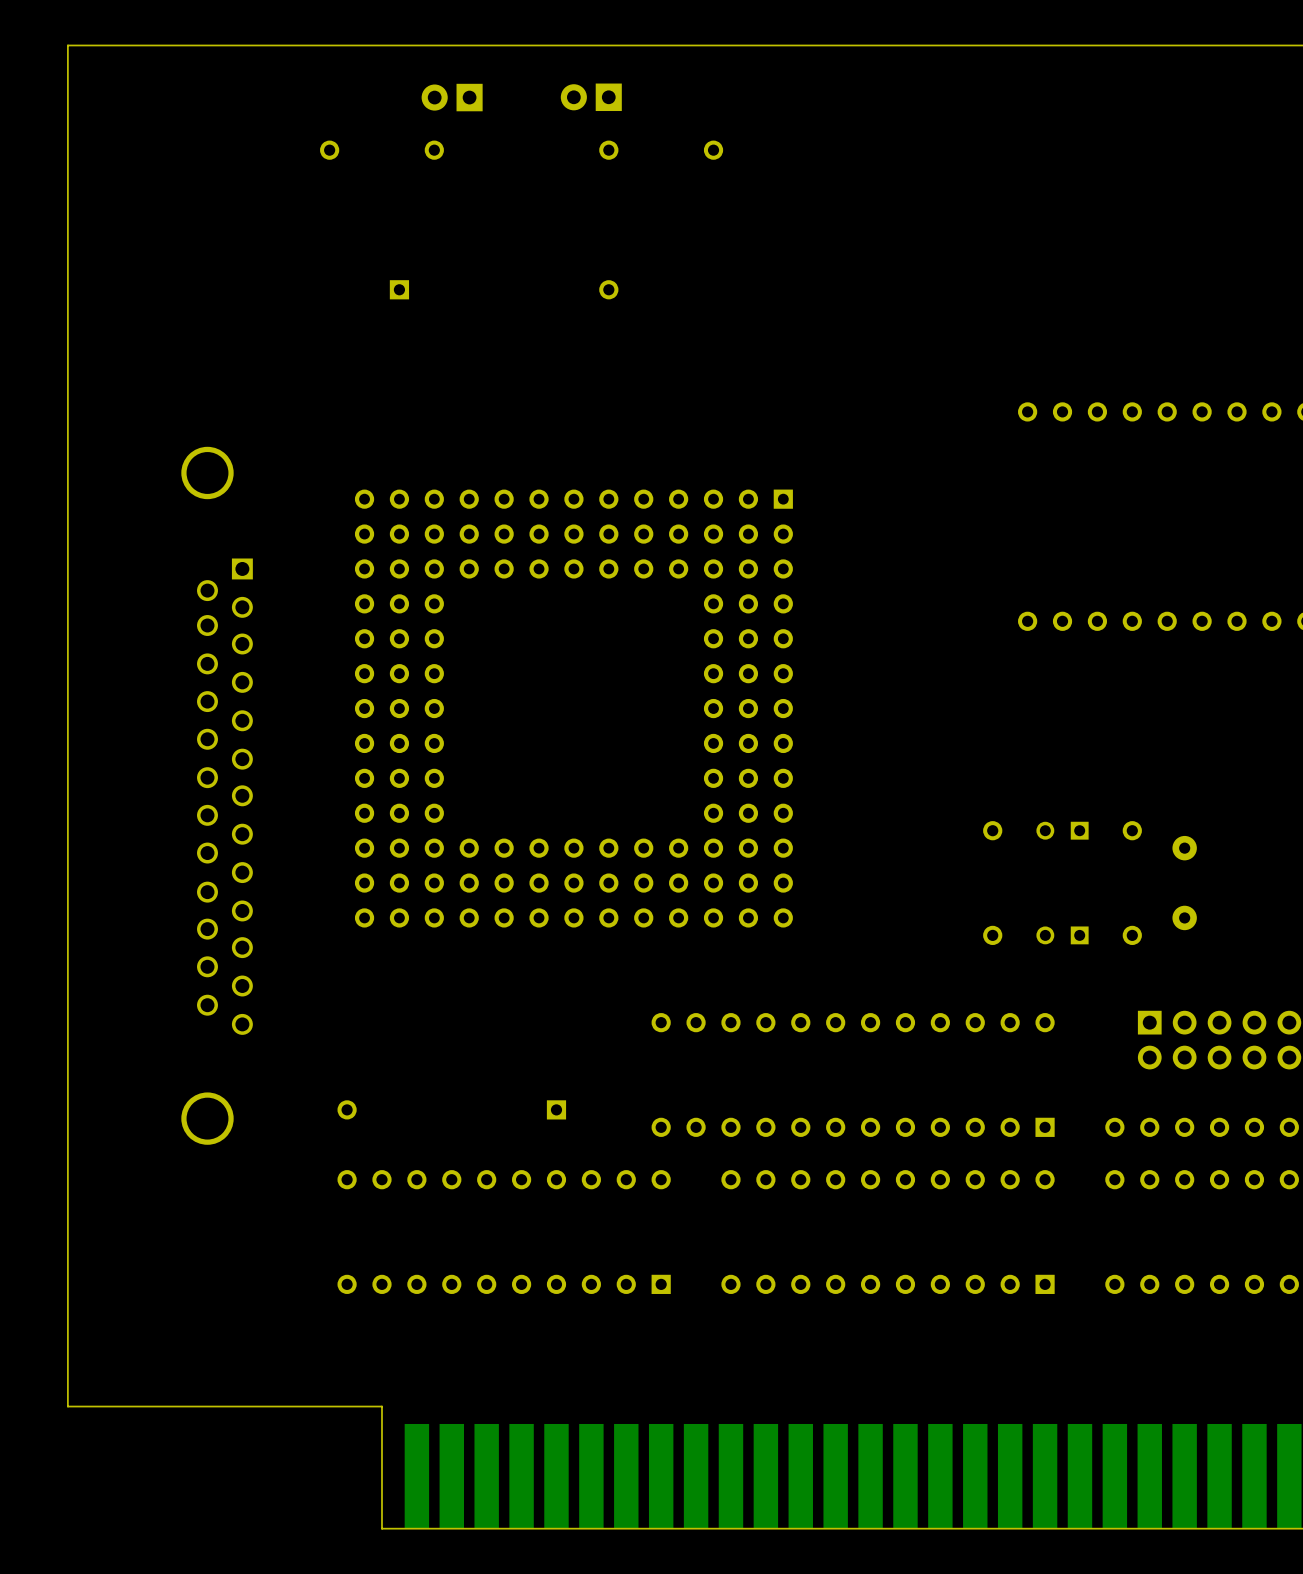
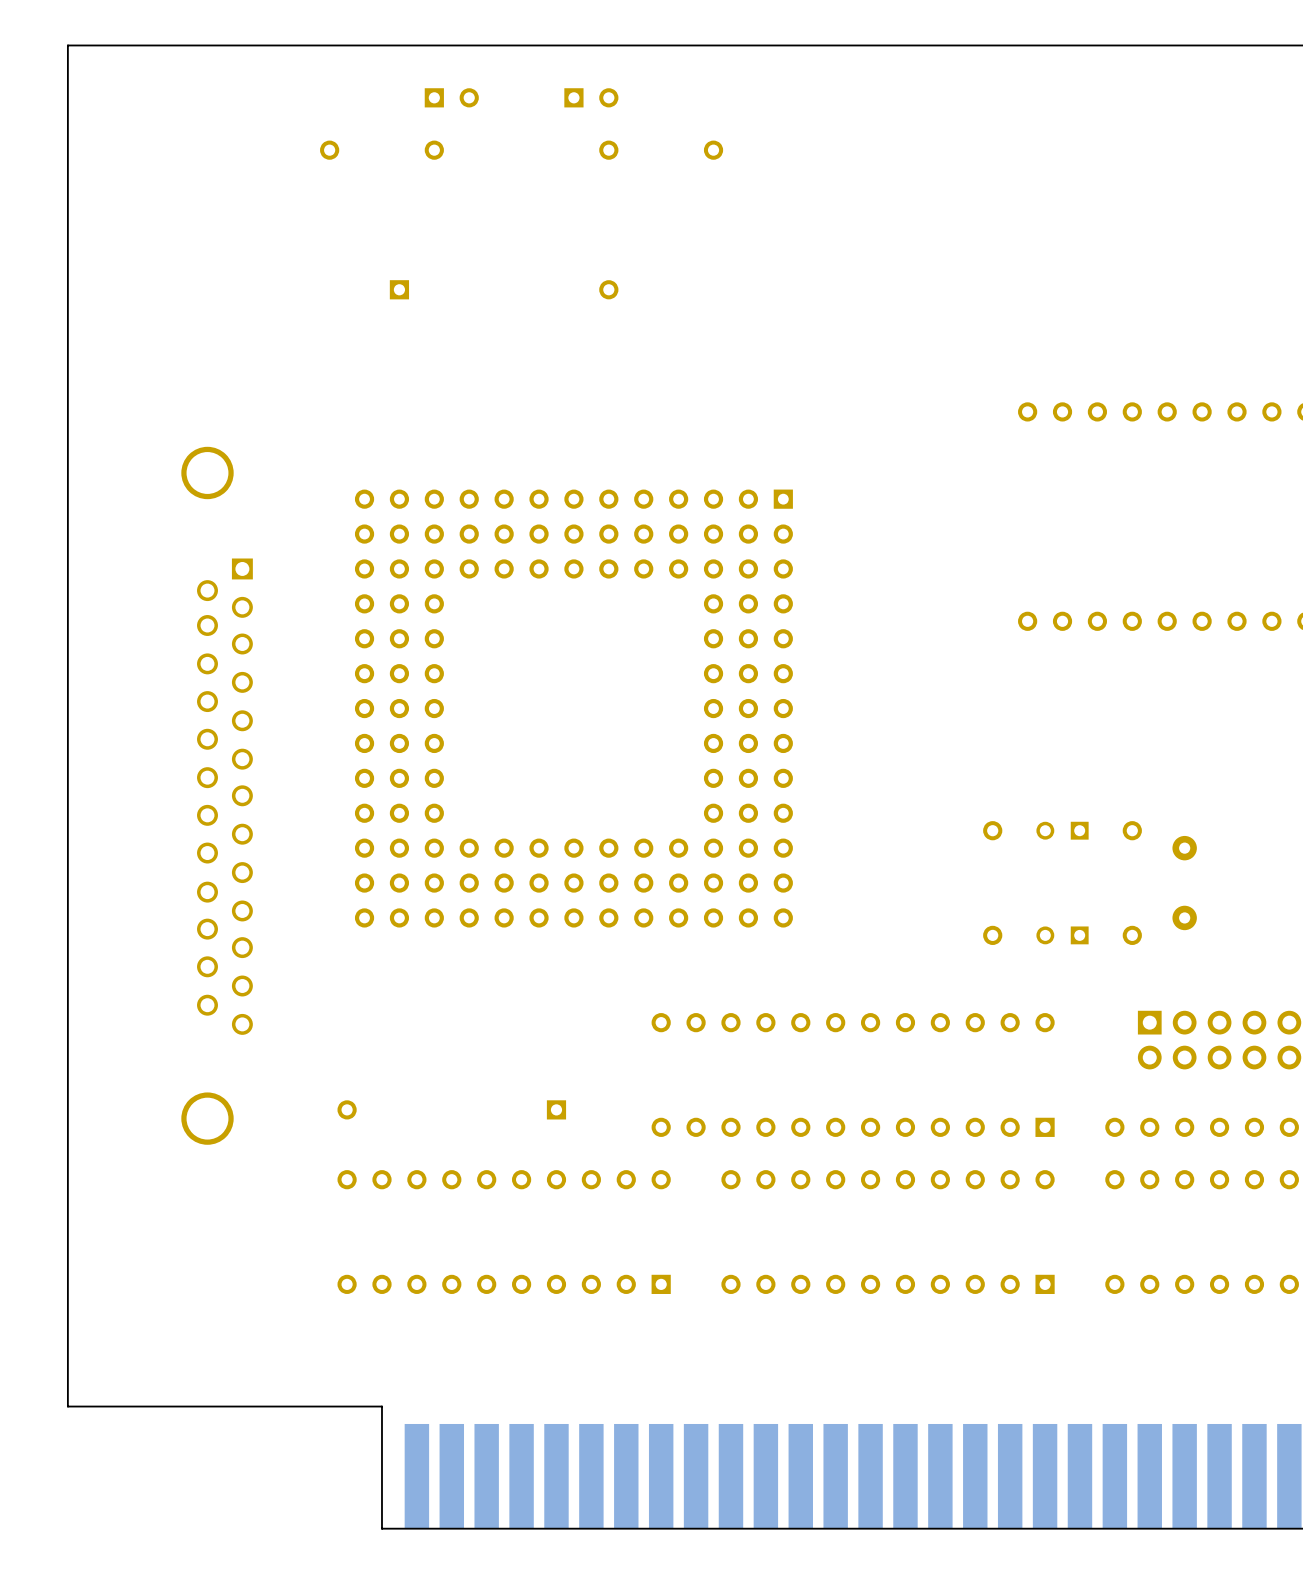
part footprint: [421, 83, 483, 112] -> [424, 88, 479, 108]
part footprint: [560, 83, 622, 112] -> [564, 88, 619, 108]

